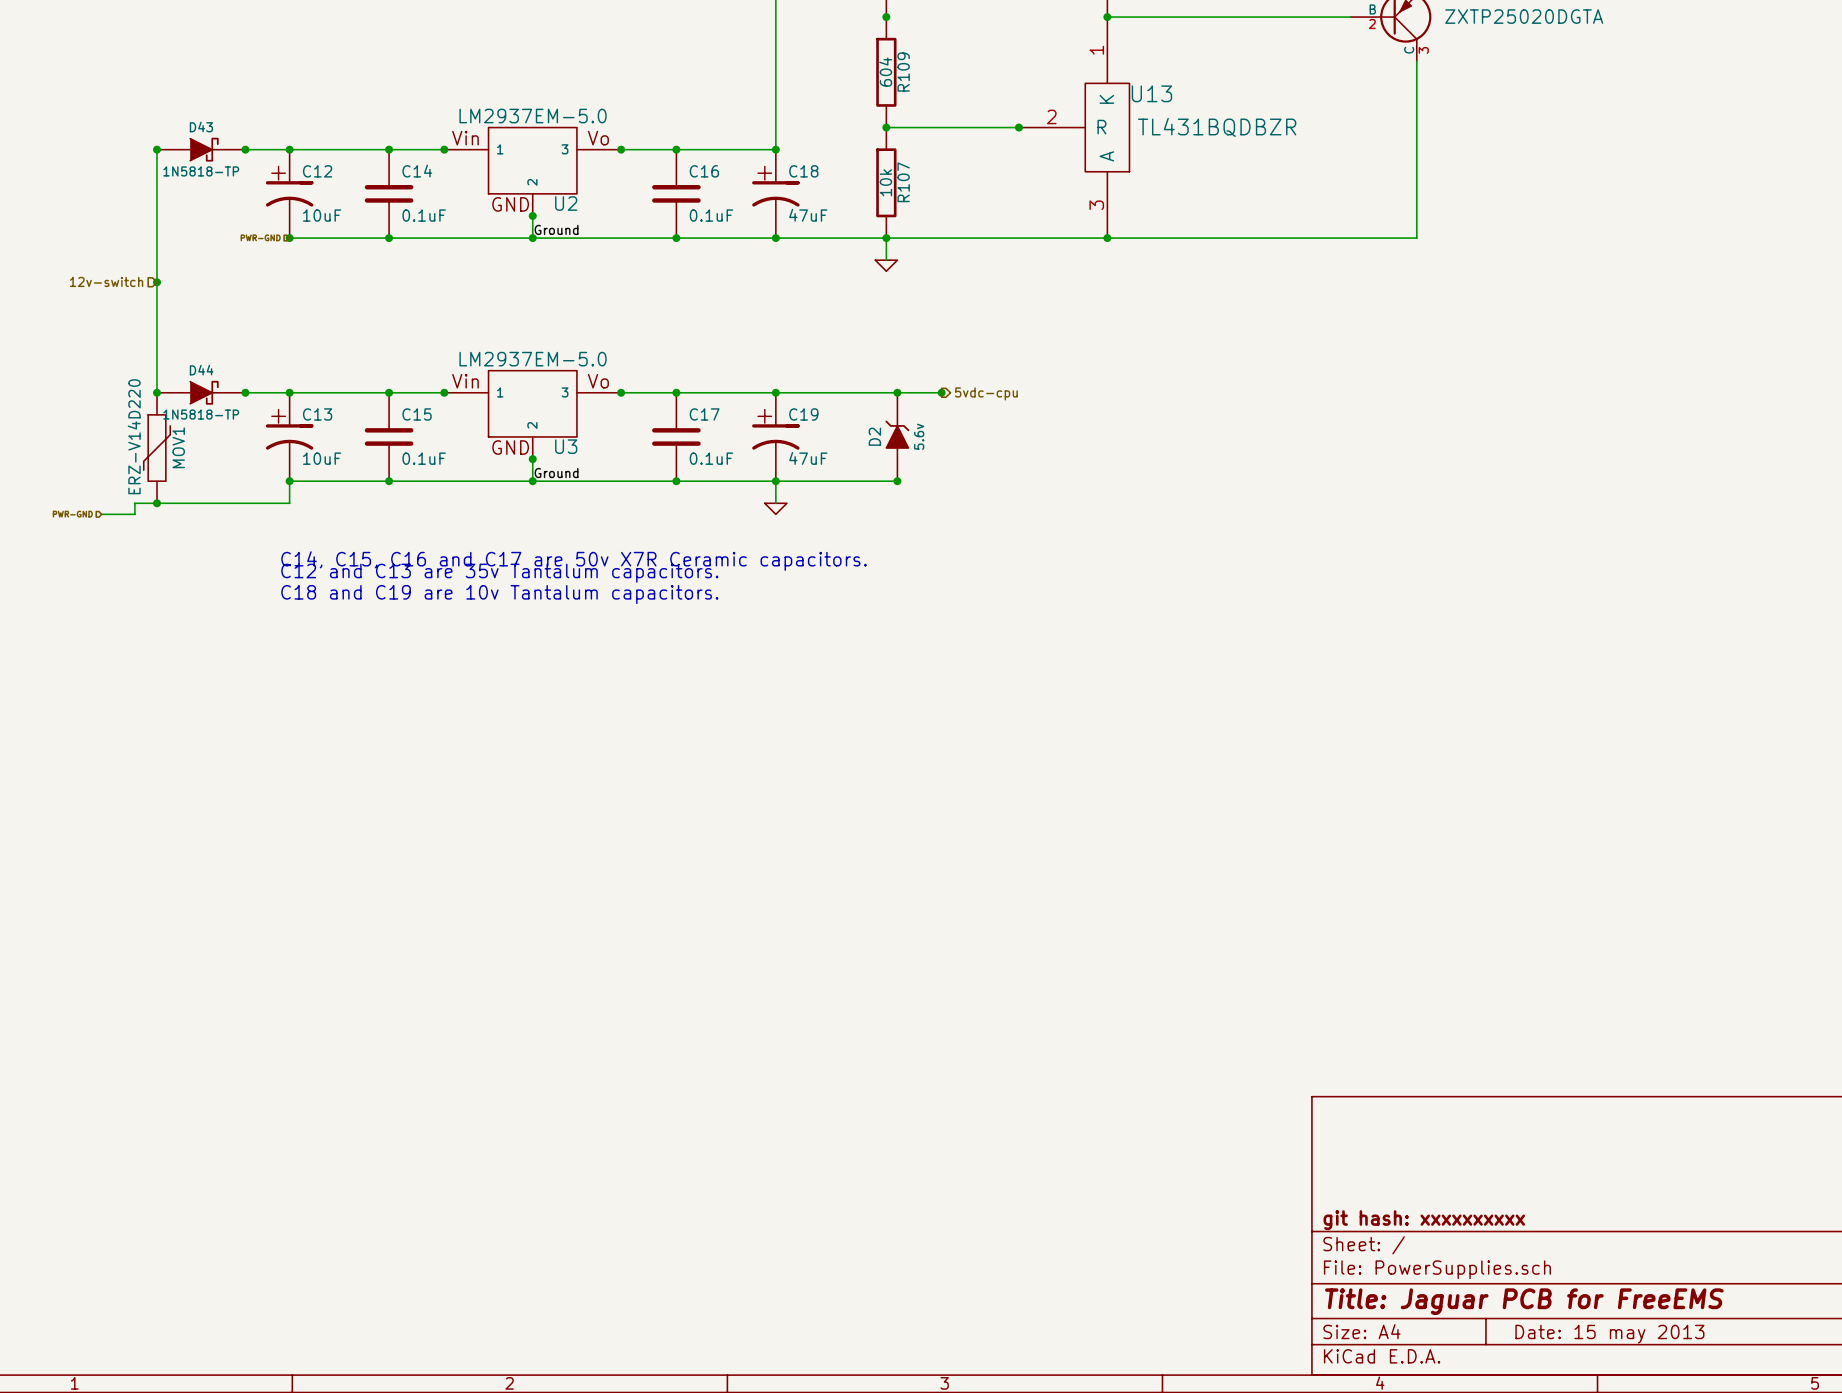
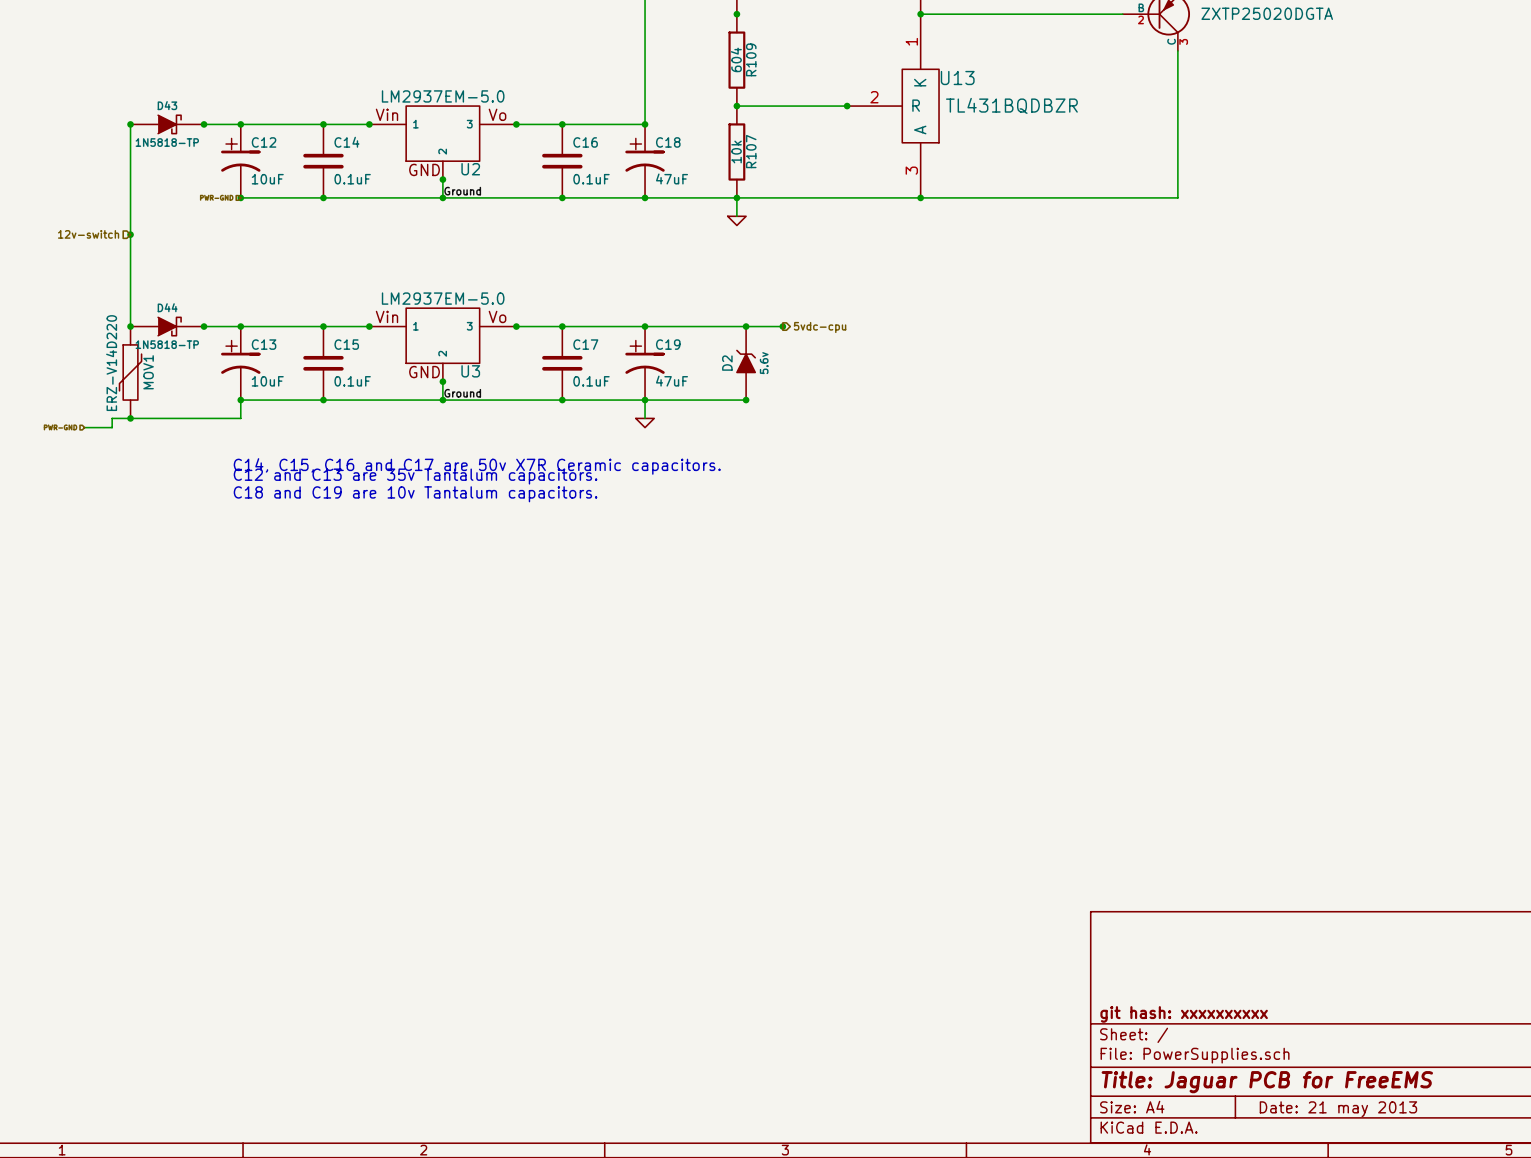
title block: Date: 15 may 2013 (1609, 1334) -> Date: 21 may 2013 (1338, 1109)

